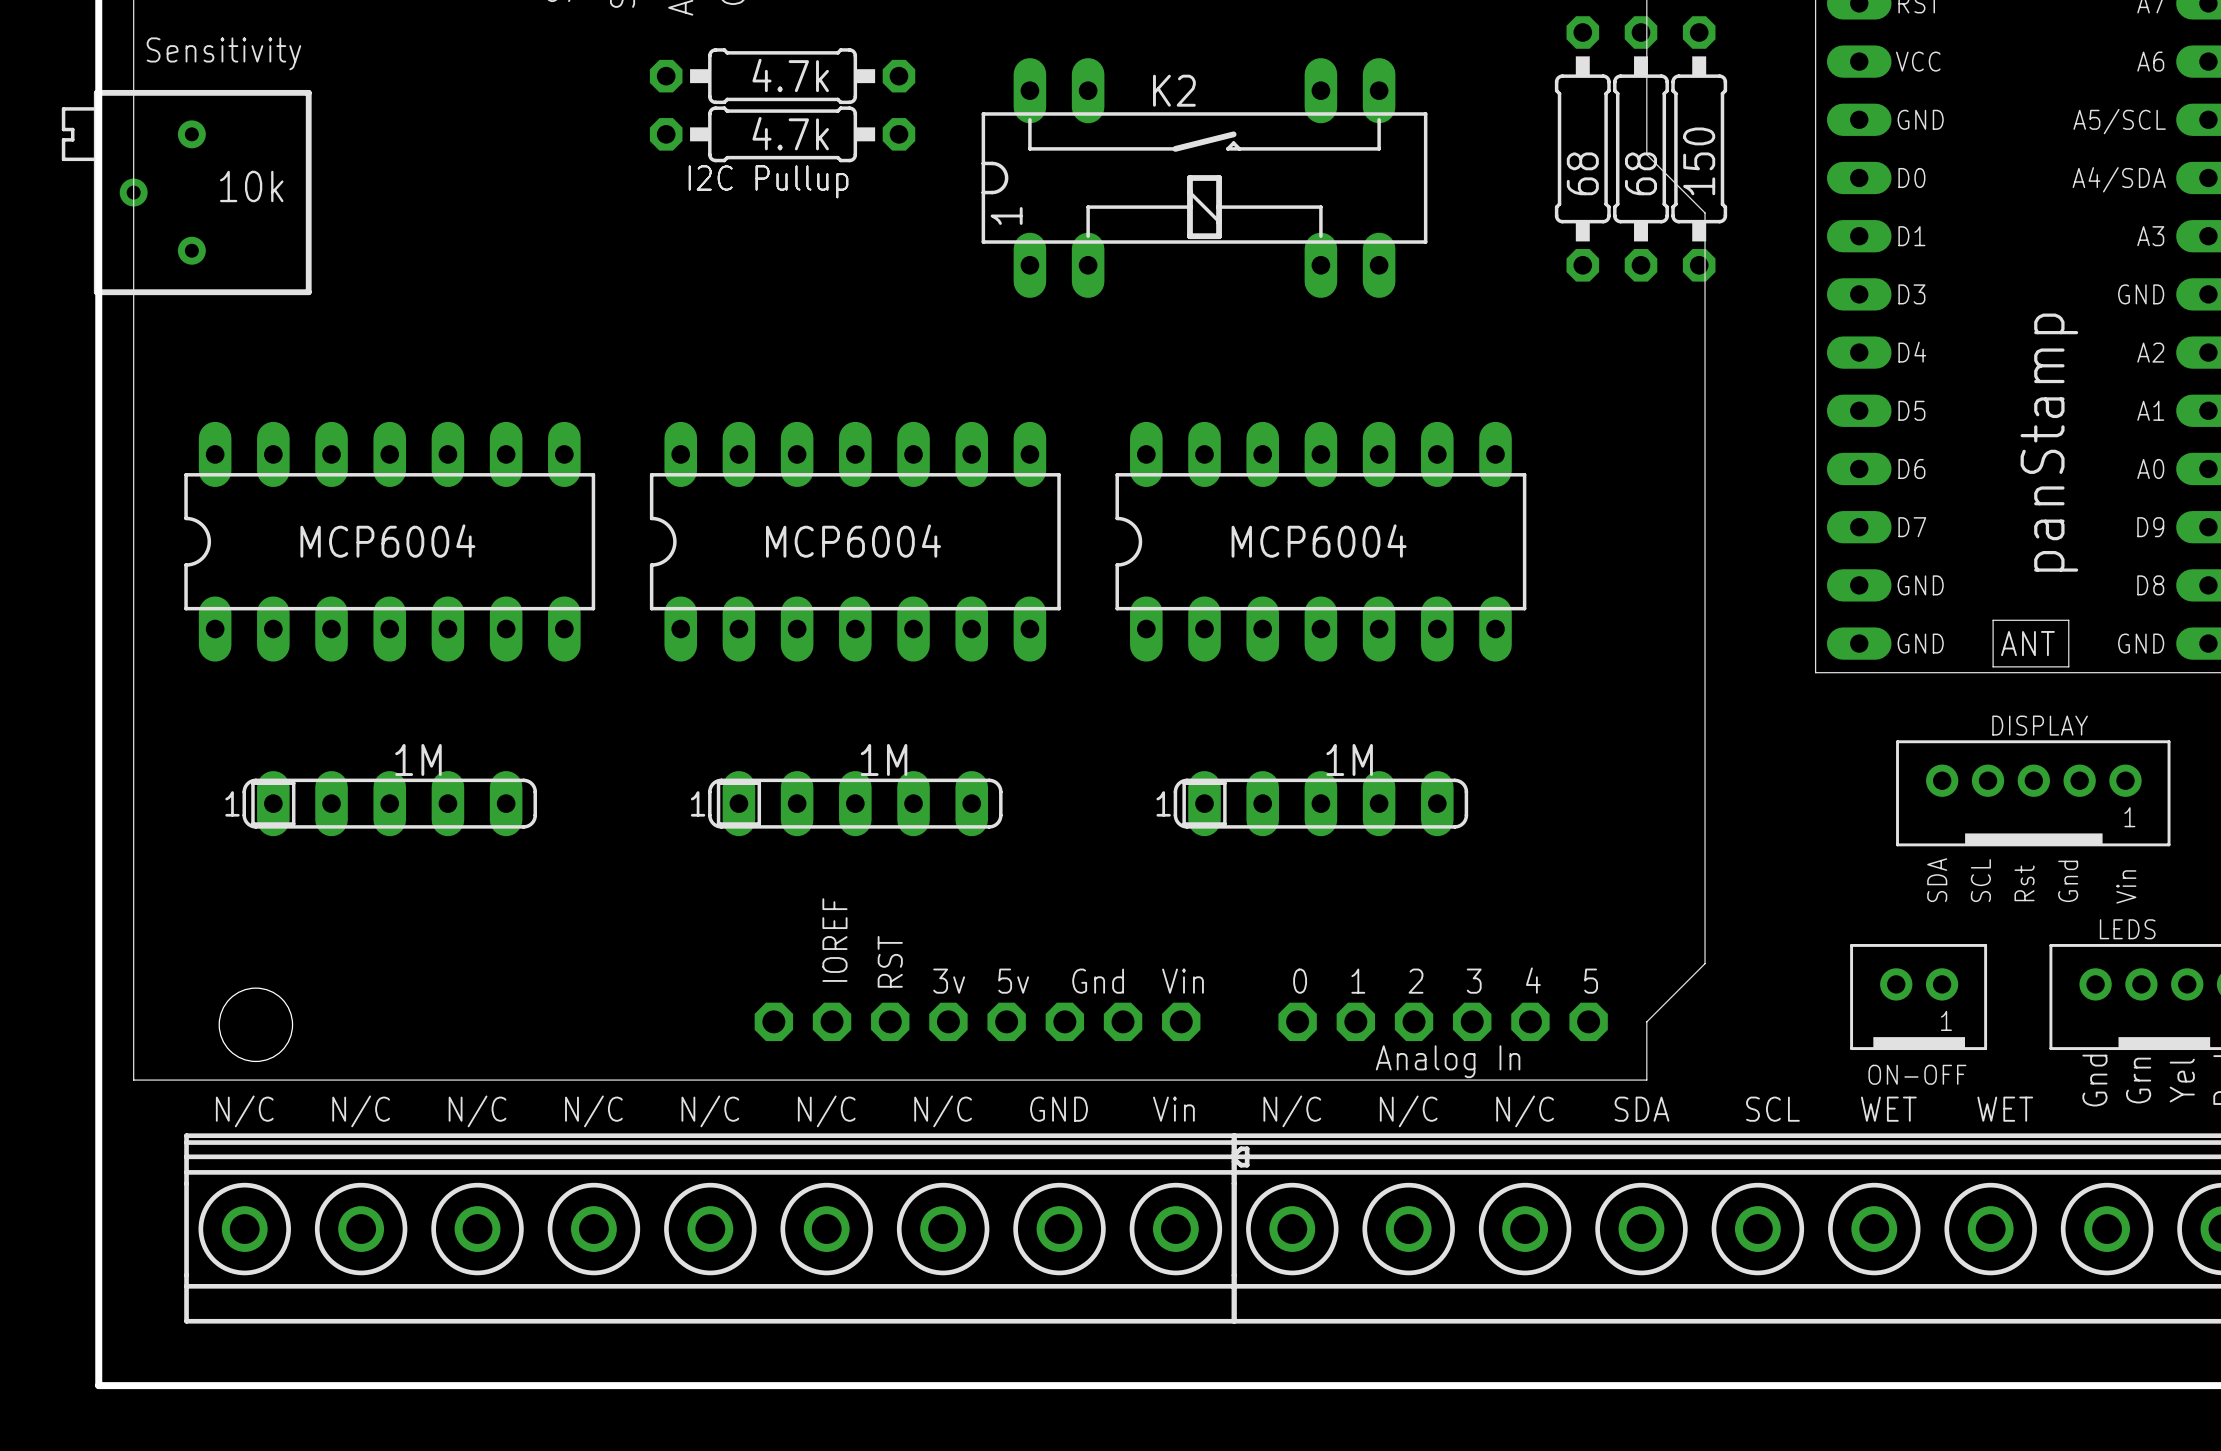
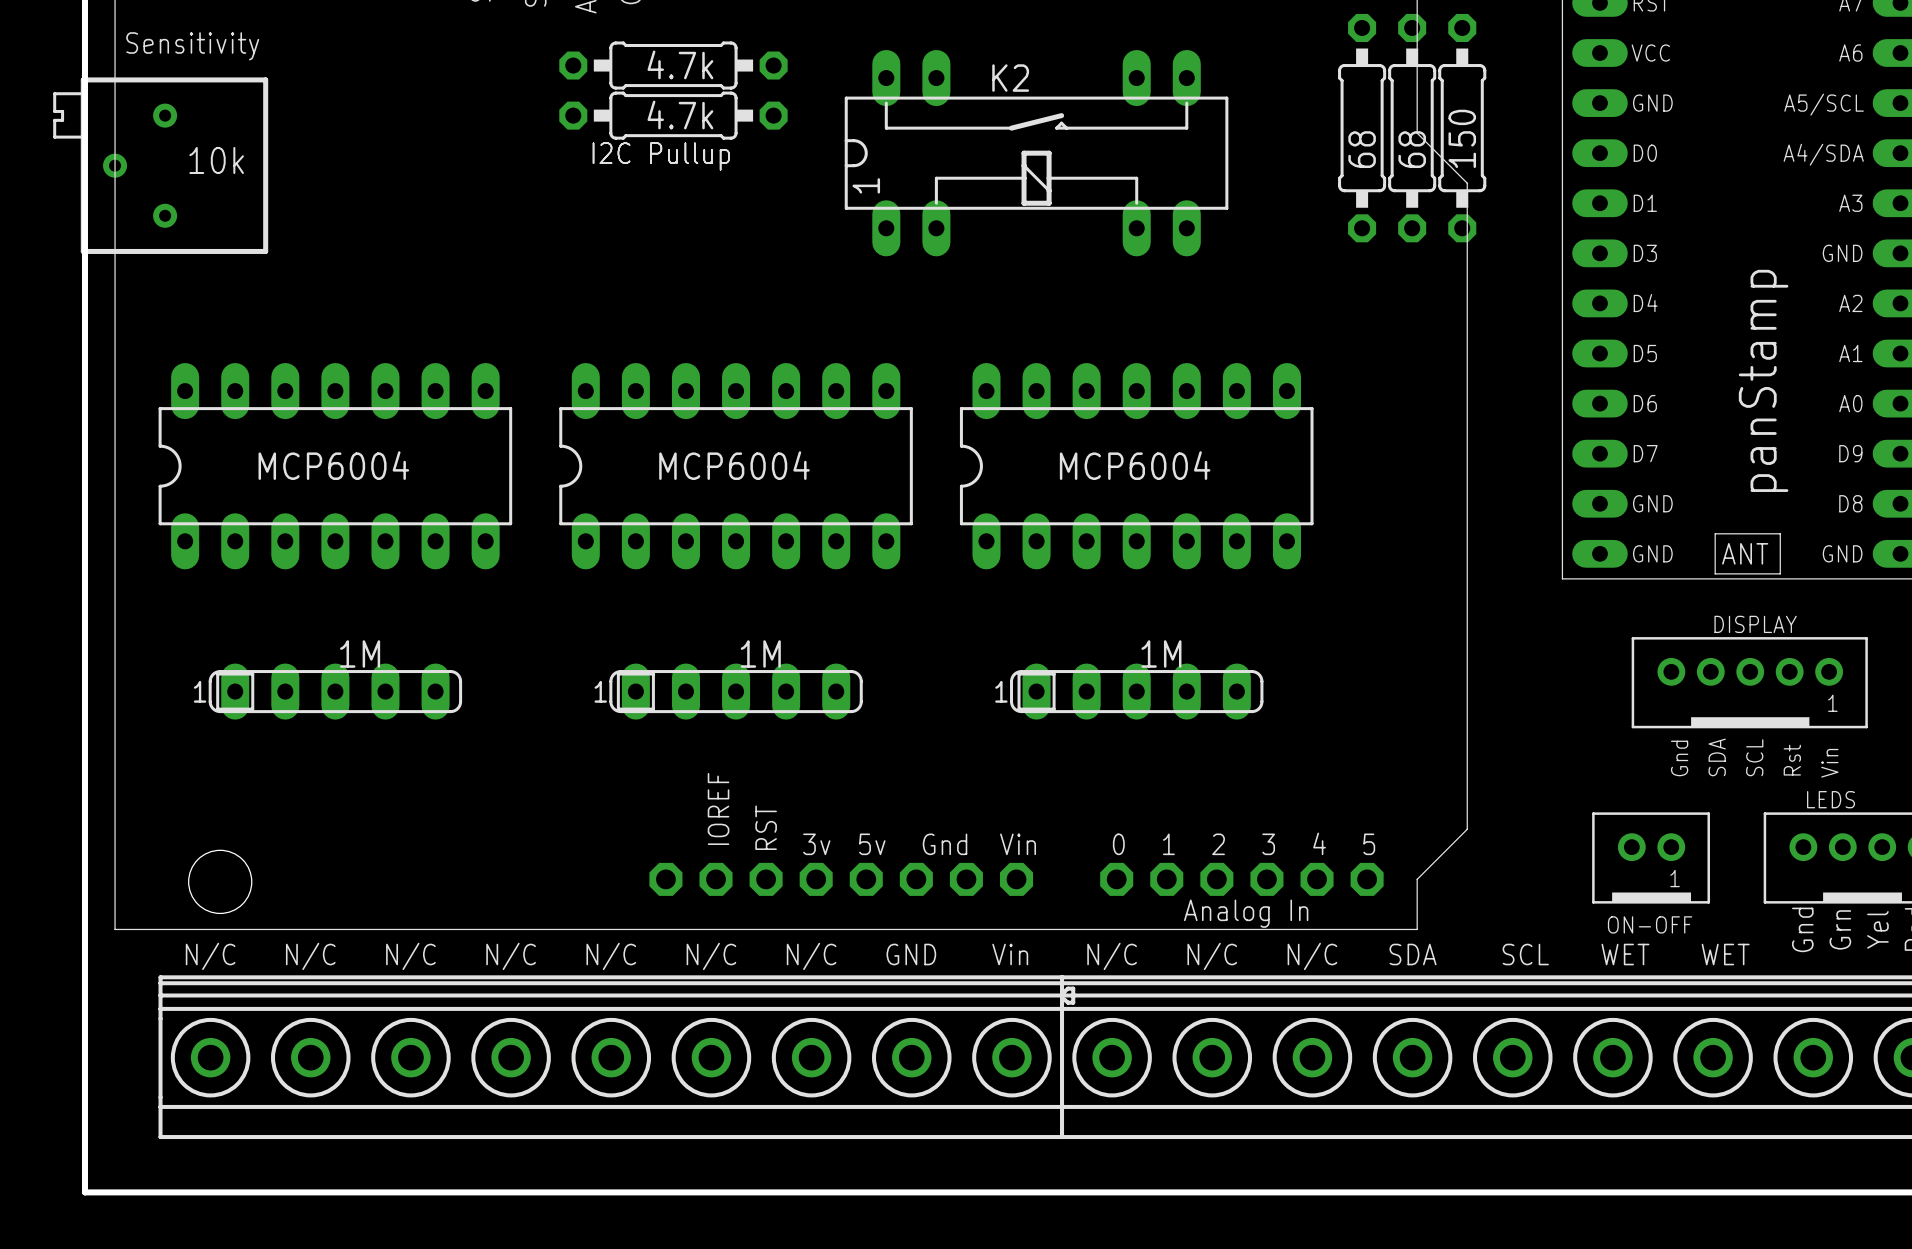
text position: SDA (1937, 880) -> SDA (1717, 757)
text position: SCL (1980, 880) -> SCL (1754, 757)
text position: Gnd (2068, 881) -> Gnd (1679, 758)
text position: Rst (2024, 883) -> Rst (1792, 760)

